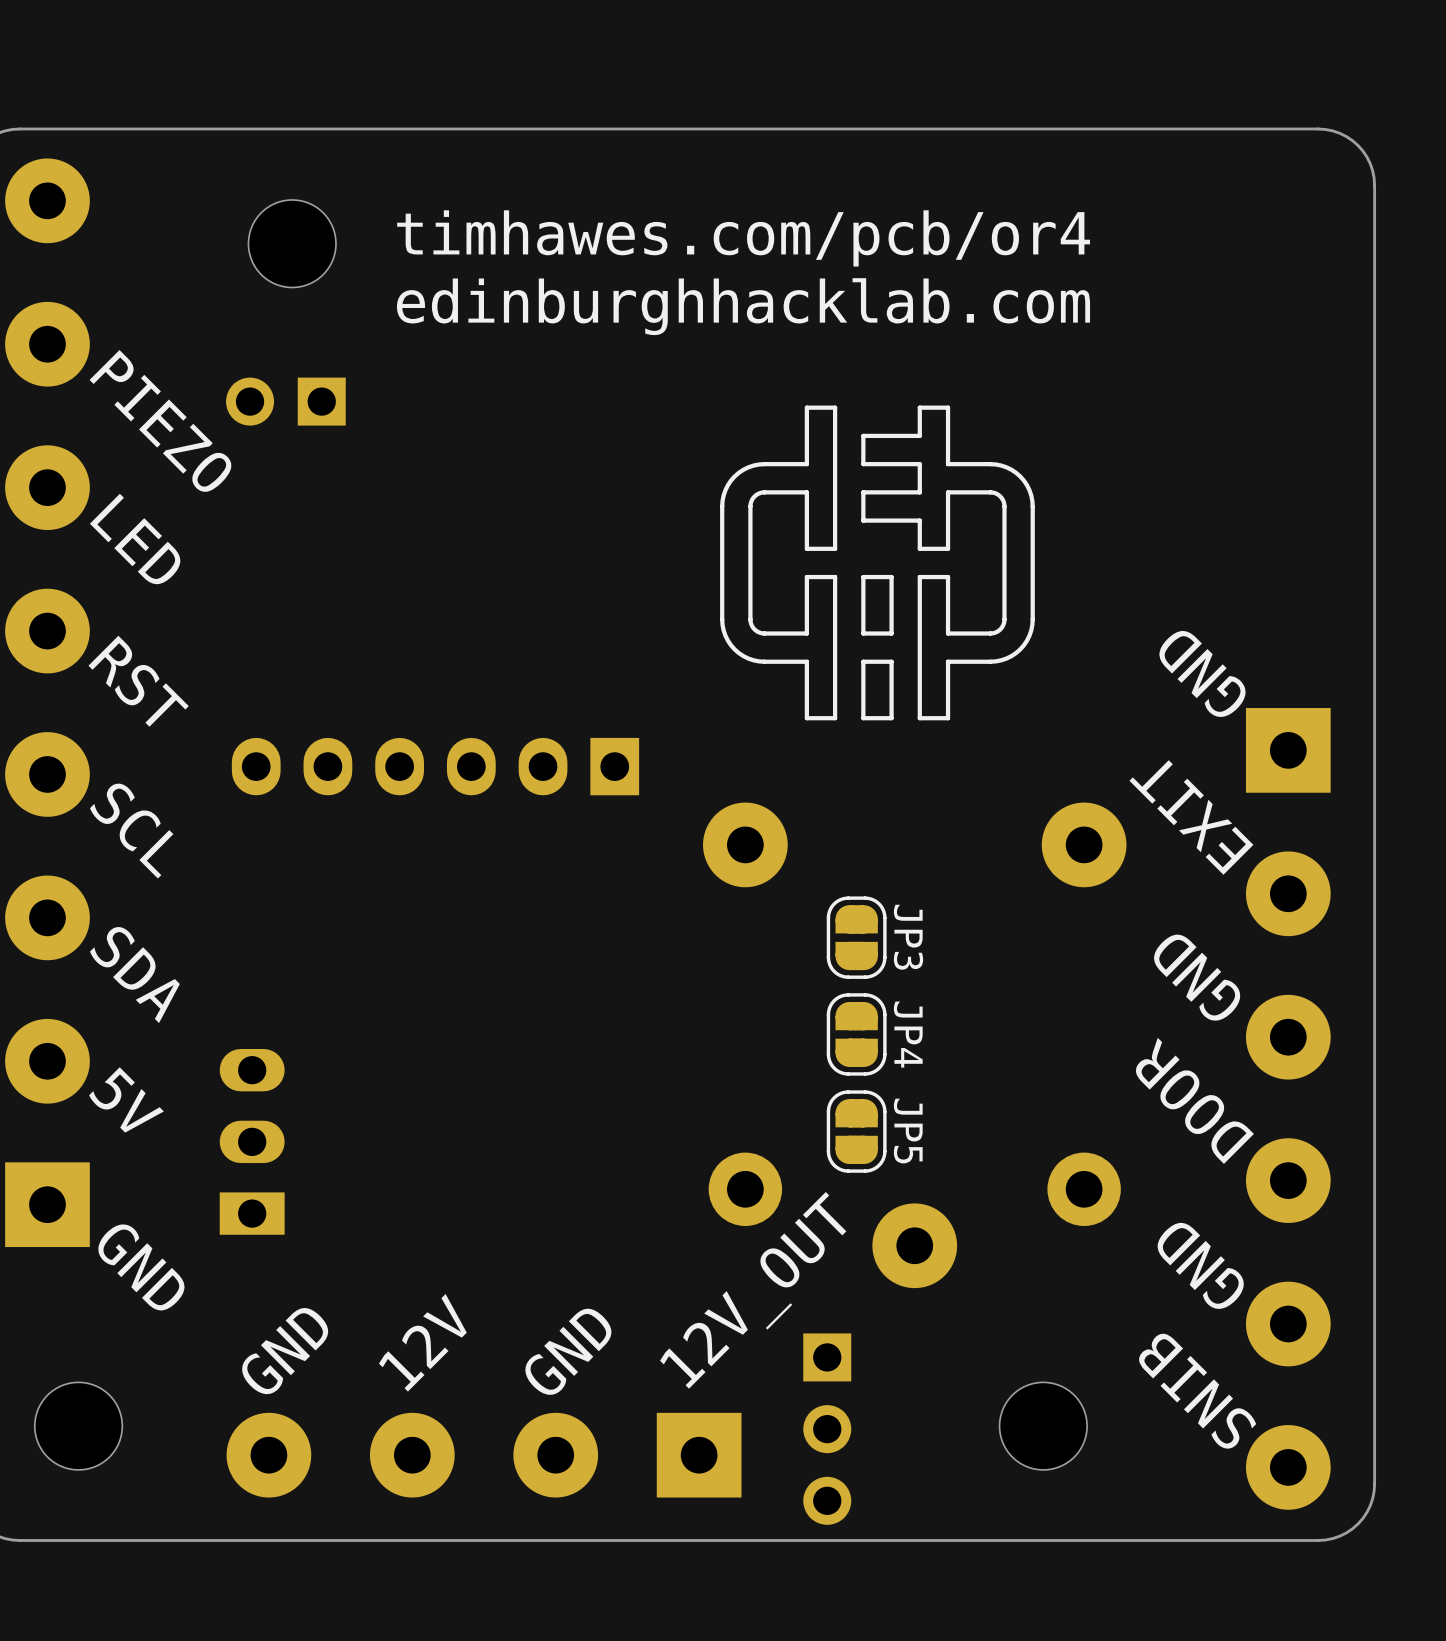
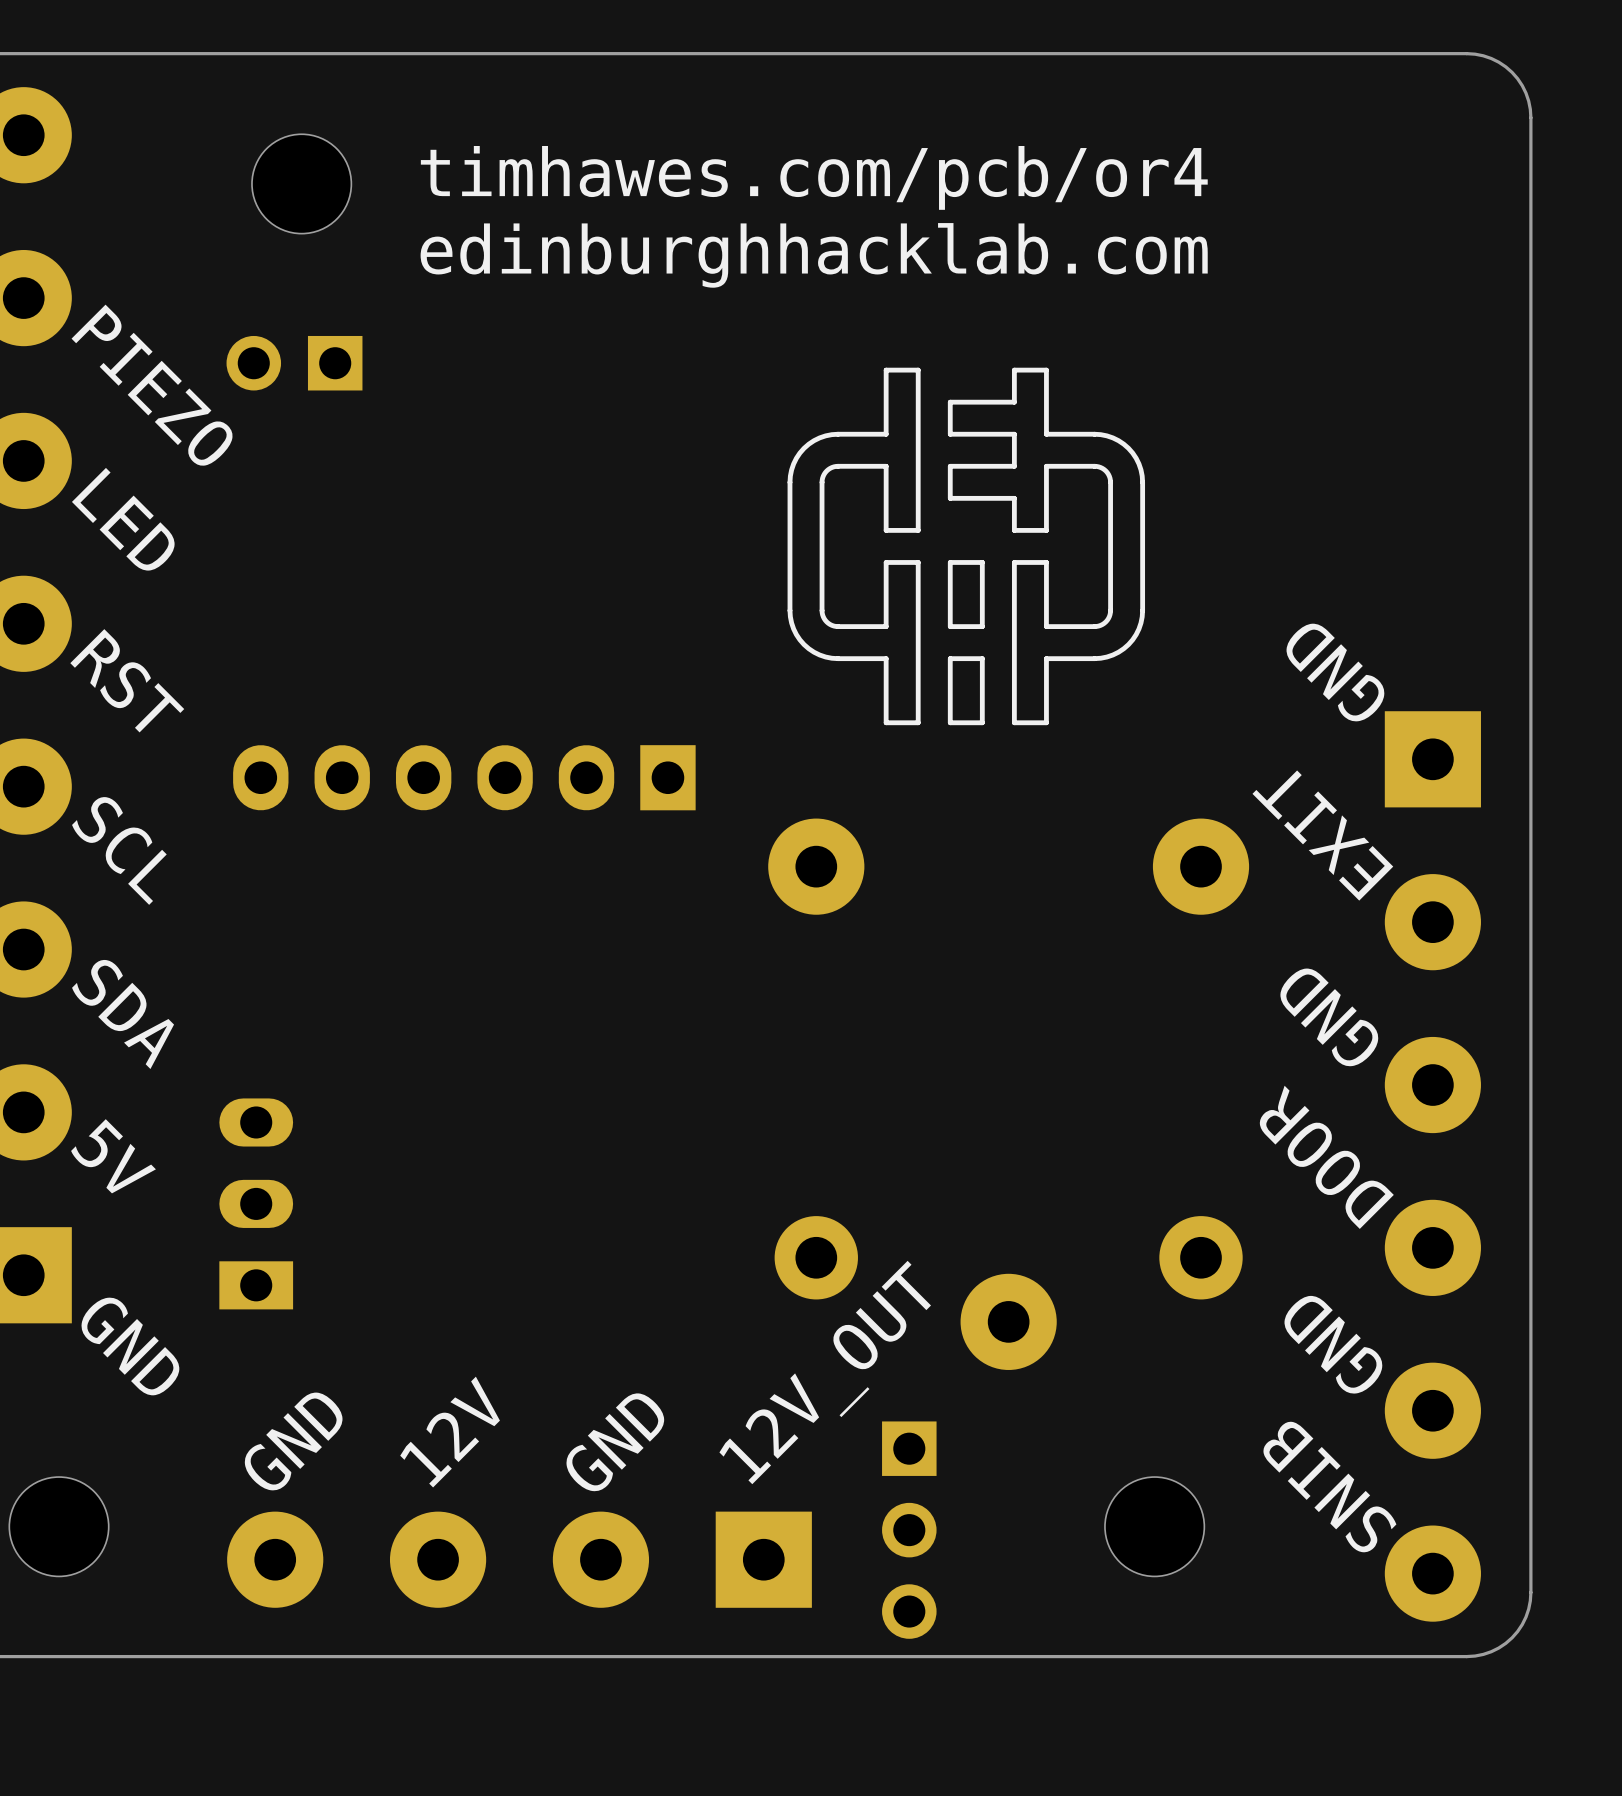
JP3: (856, 937) -> none
JP4: (856, 1034) -> none
JP5: (856, 1131) -> none

